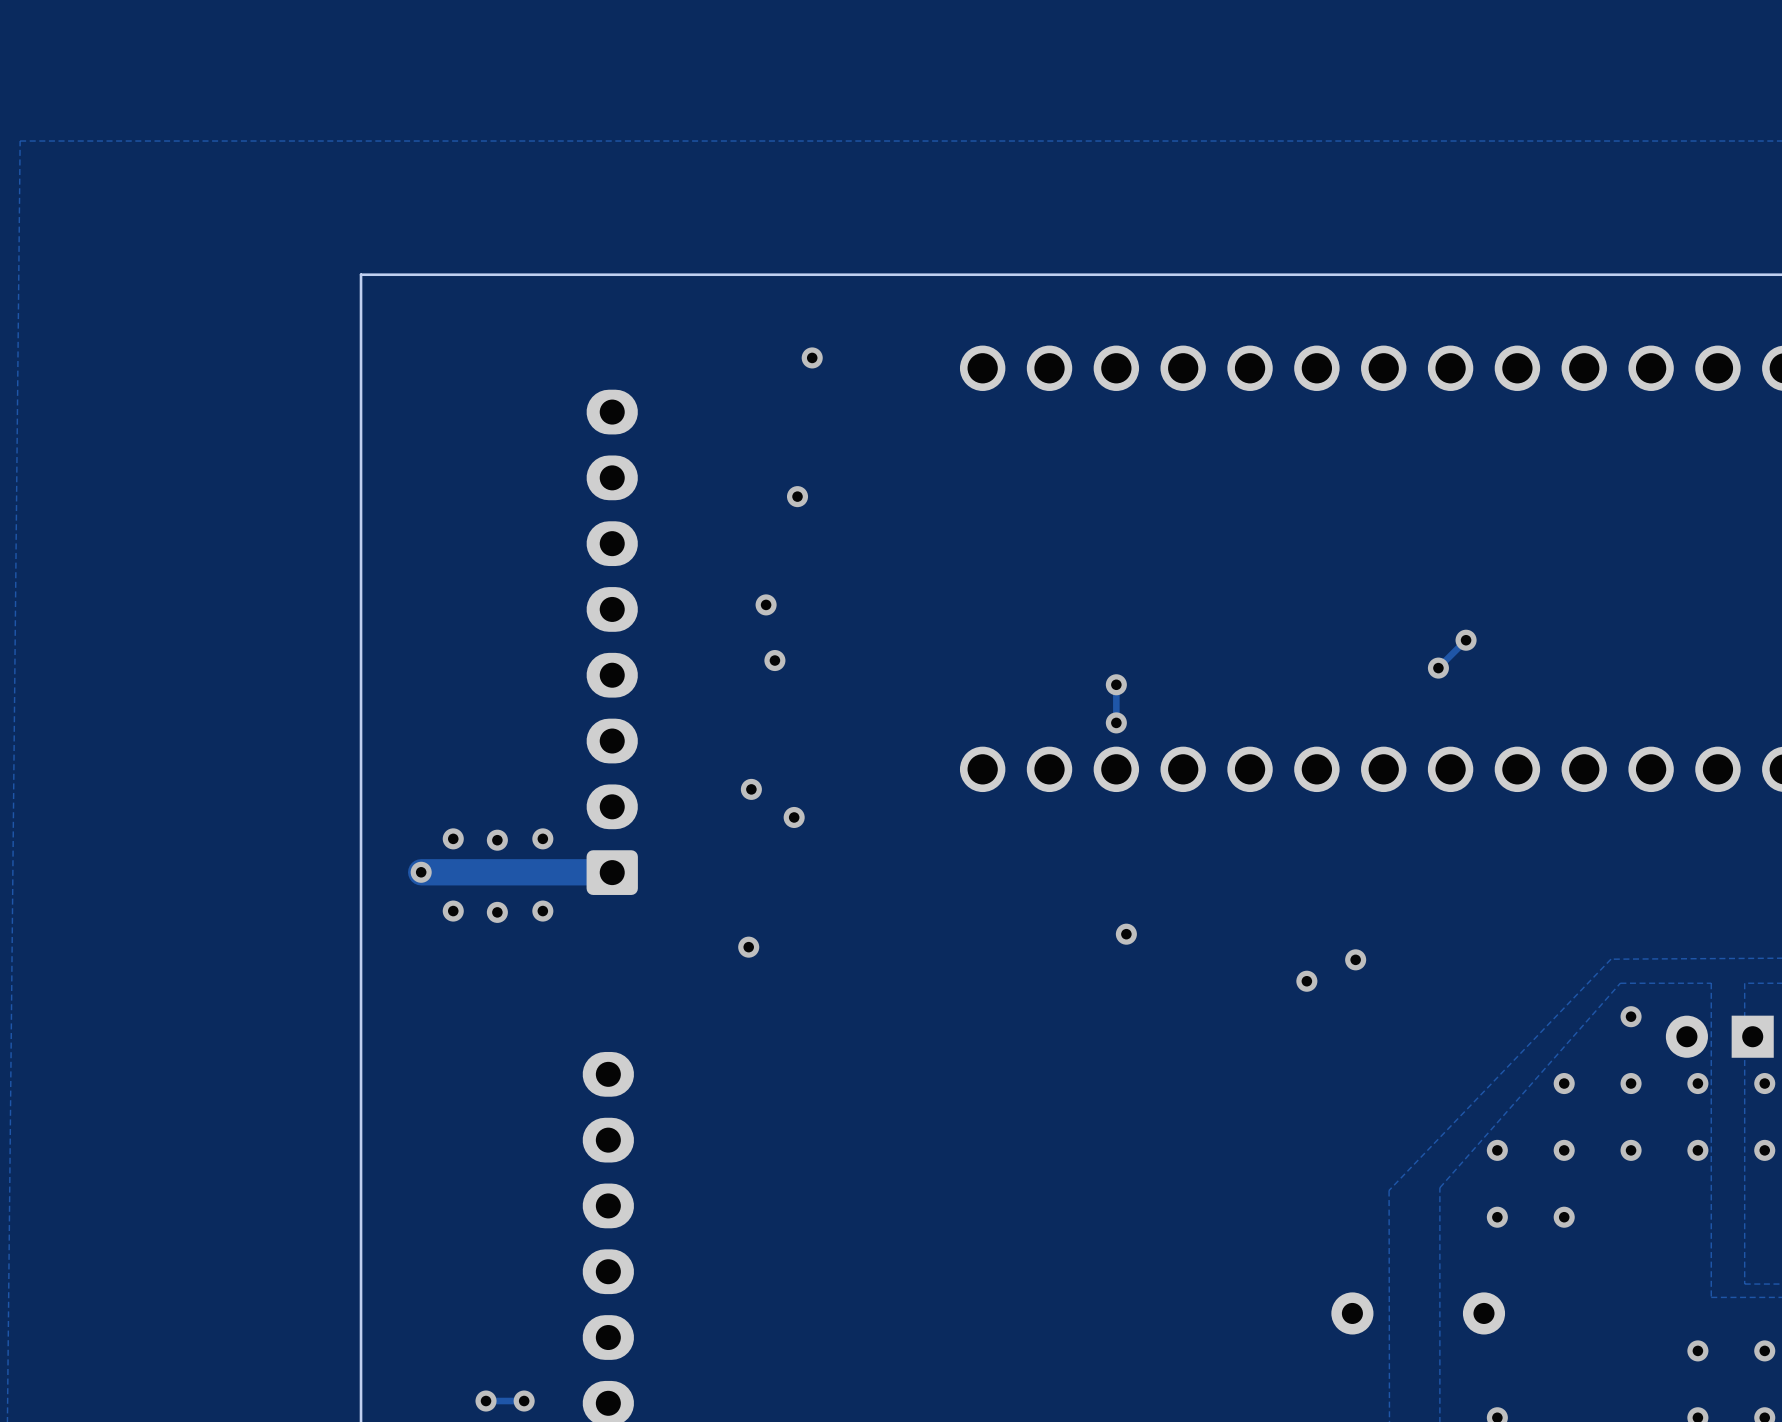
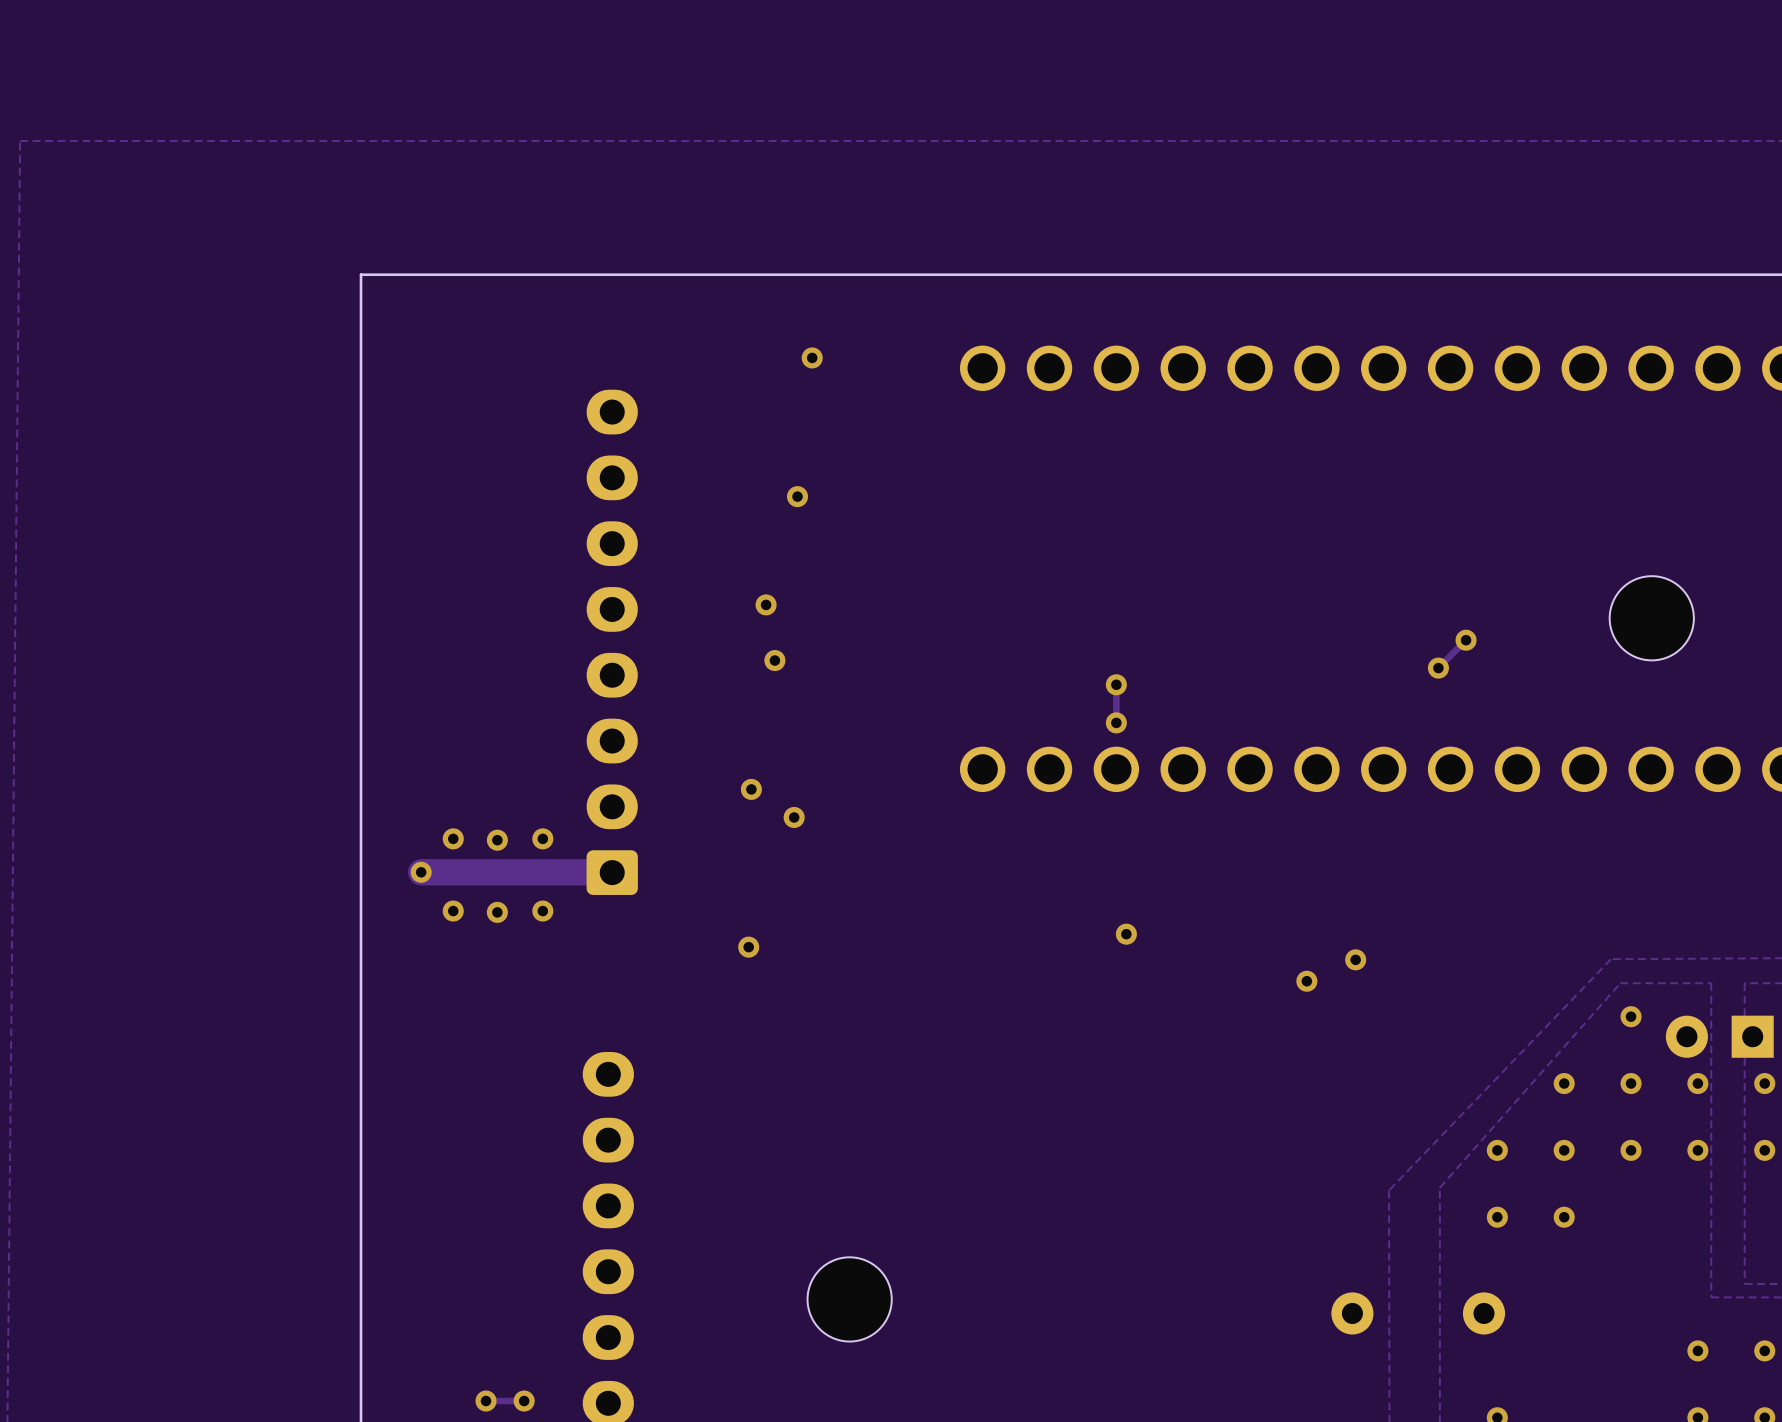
part: none -> (1651, 618)
part: none -> (849, 1299)

